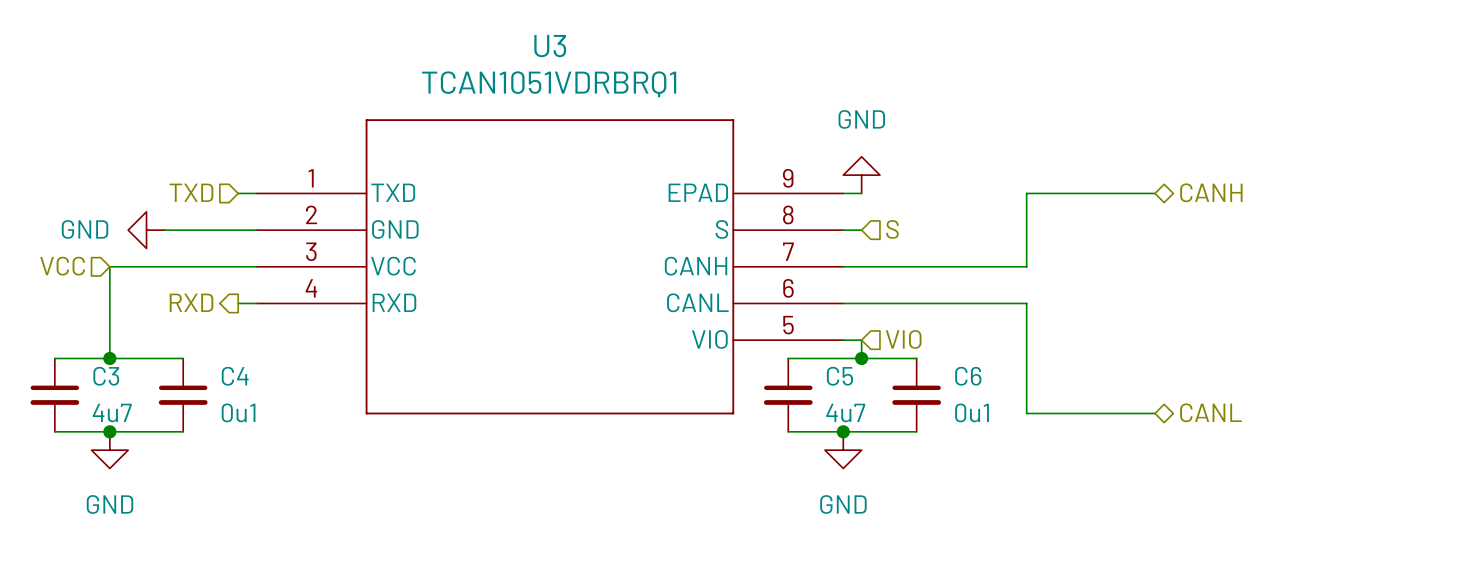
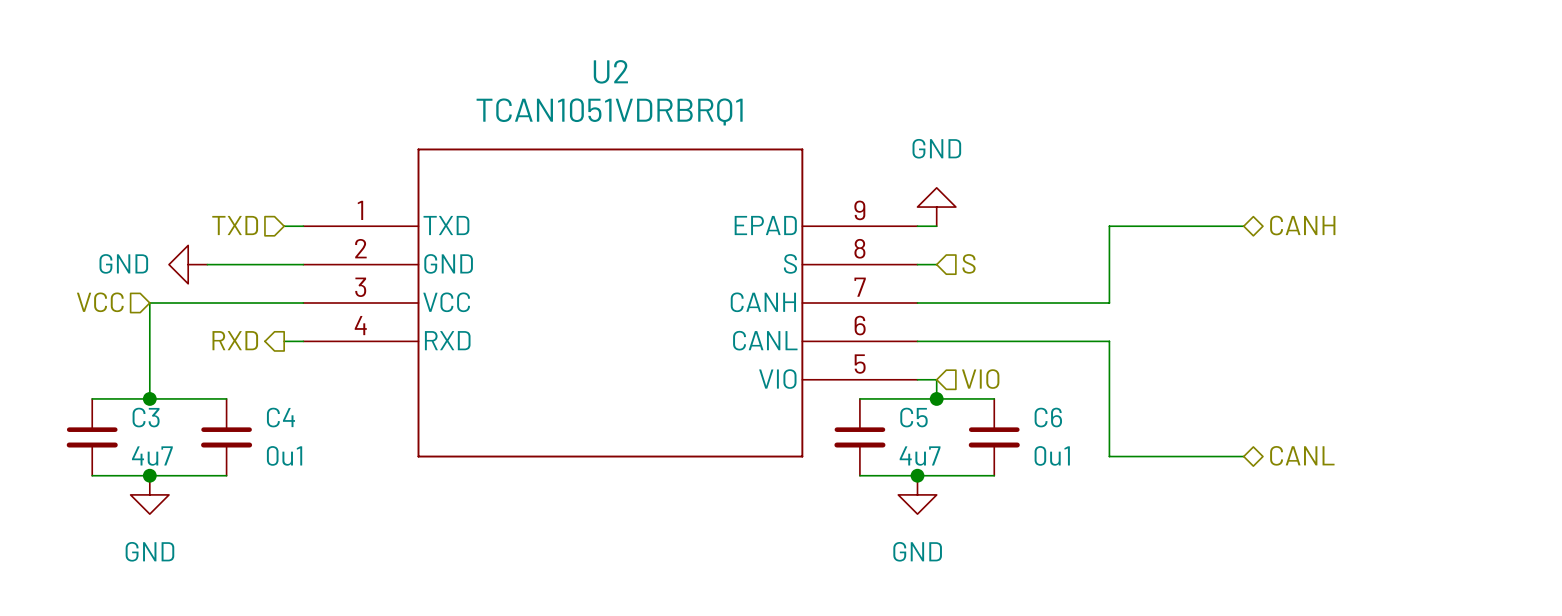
U3 name: U3 (550, 46) -> U2 (610, 71)

